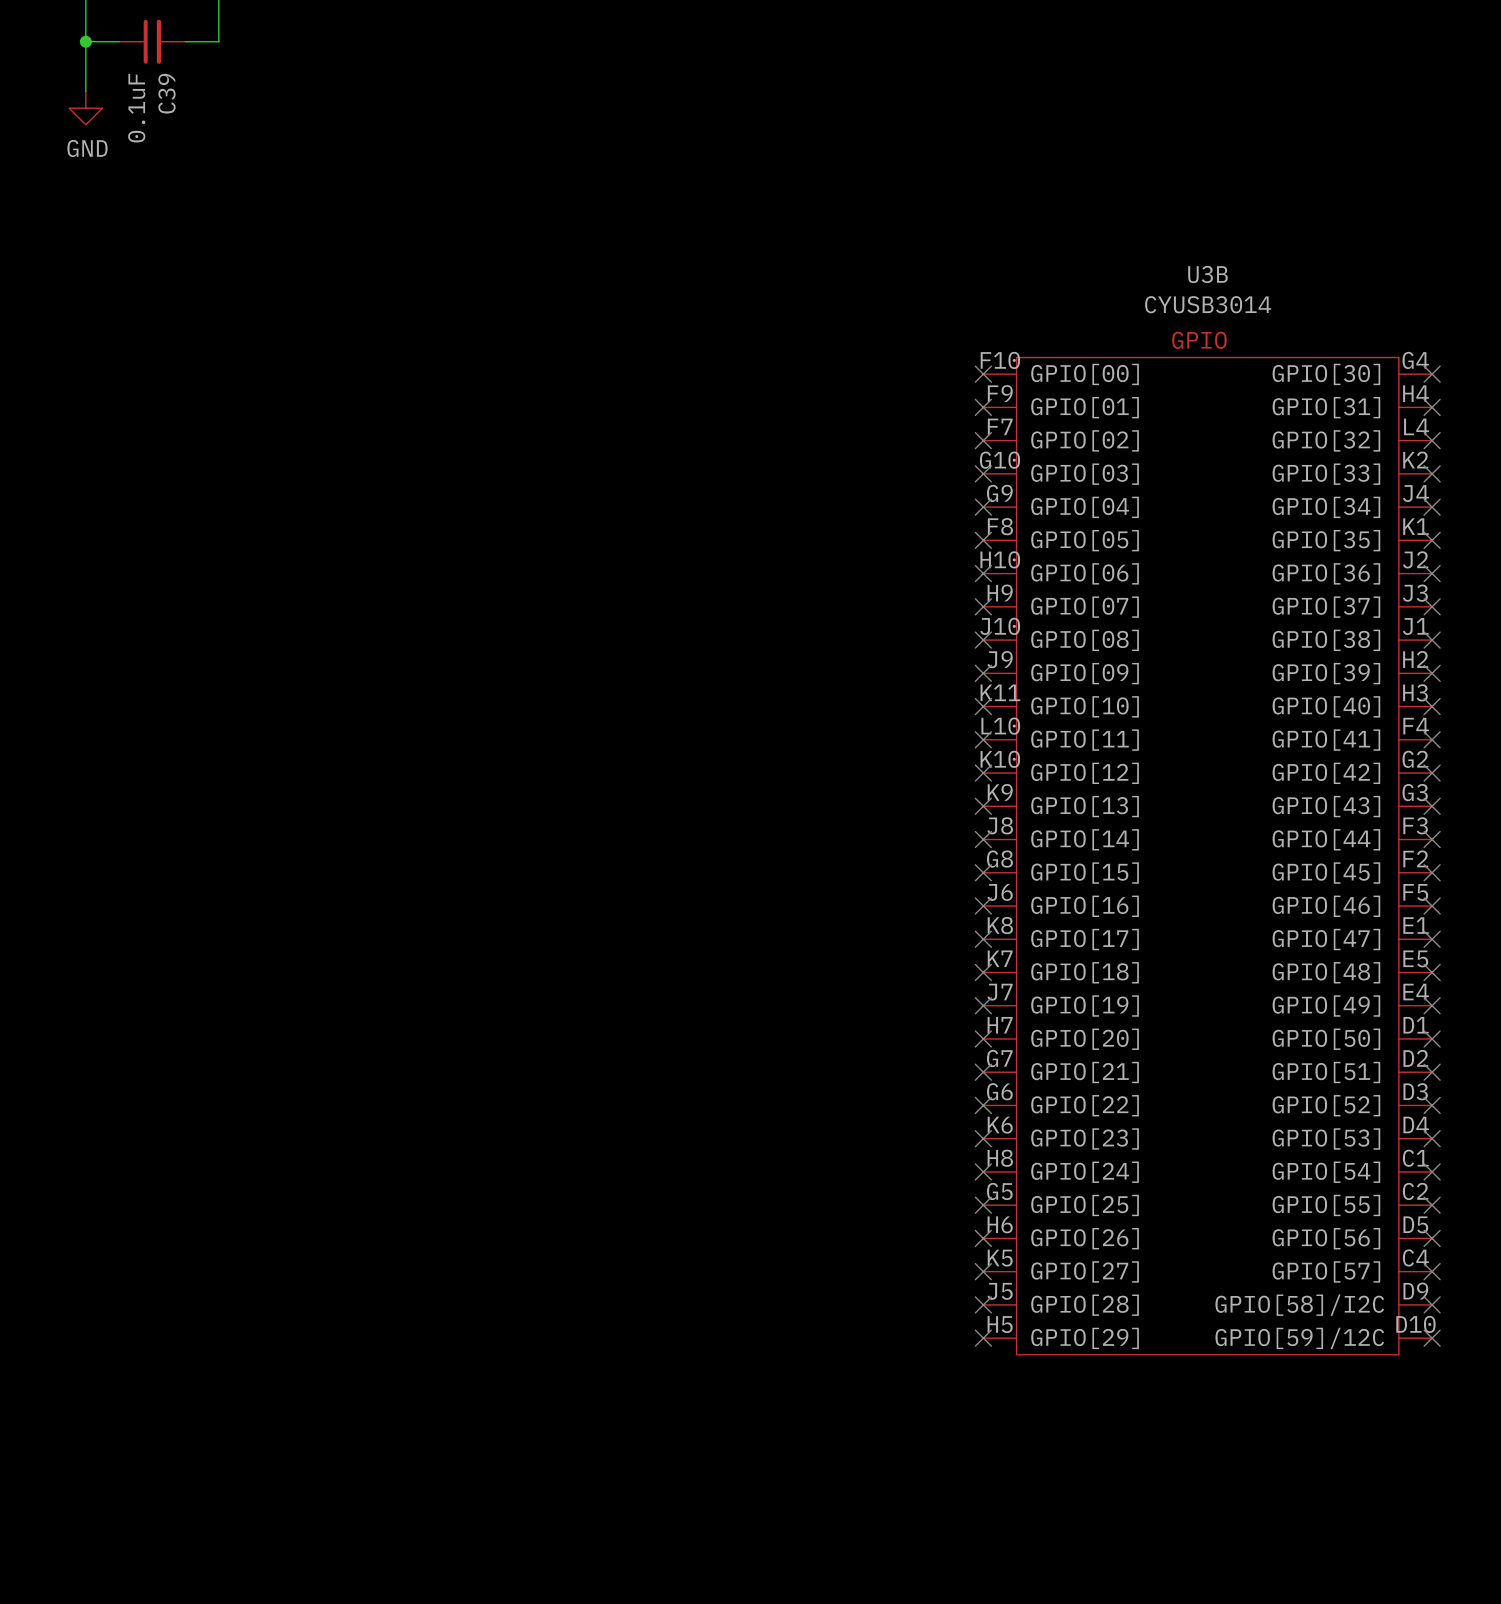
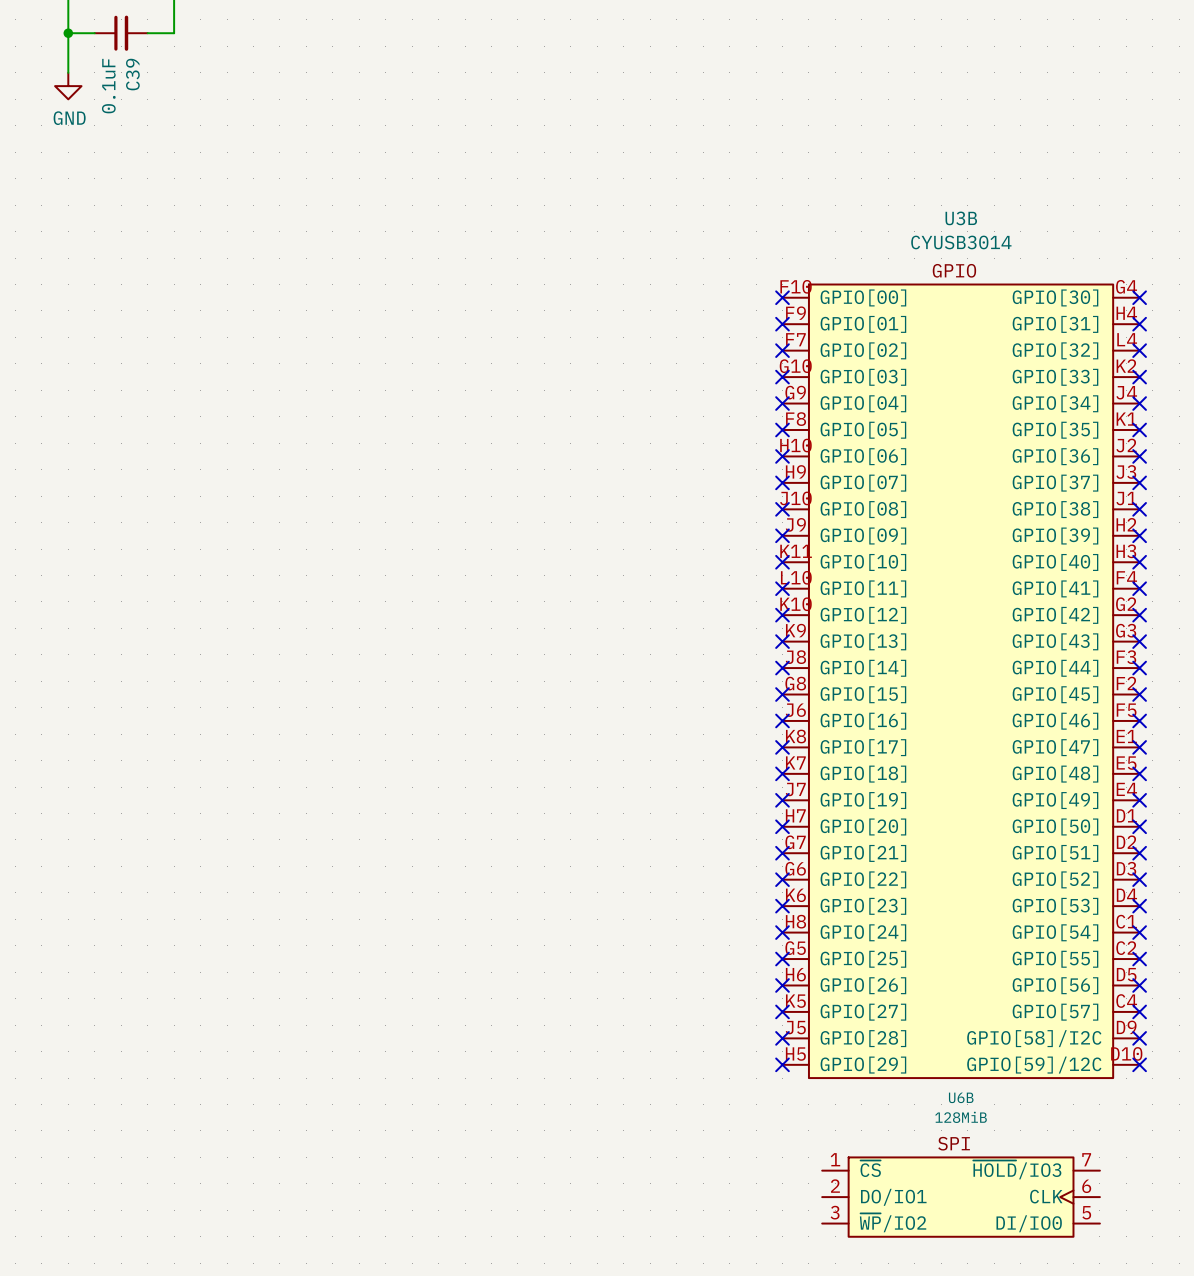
U6B: none -> 128MiB (961, 1197)

